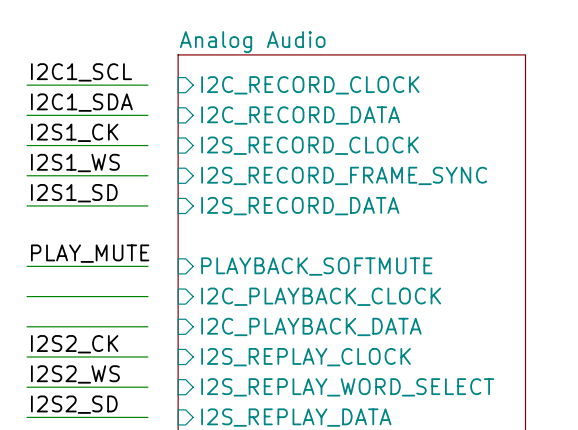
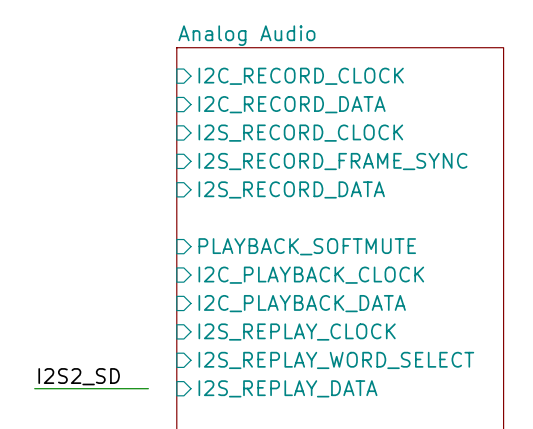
label: I2C1_SCL (81, 72) -> none
wire: (27, 85) (147, 85) -> none
label: I2C1_SDA (81, 102) -> none
wire: (27, 115) (147, 115) -> none
label: I2S1_CK (74, 132) -> none
wire: (27, 145) (147, 145) -> none
label: I2S1_WS (75, 163) -> none
wire: (27, 175) (147, 175) -> none
label: I2S1_SD (74, 193) -> none
wire: (27, 205) (147, 205) -> none
label: PLAY_MUTE (90, 253) -> none
wire: (27, 266) (147, 266) -> none
wire: (27, 296) (147, 296) -> none
wire: (27, 326) (147, 326) -> none
label: I2S2_CK (74, 344) -> none
wire: (27, 356) (147, 356) -> none
label: I2S2_WS (75, 374) -> none
wire: (27, 387) (147, 387) -> none

